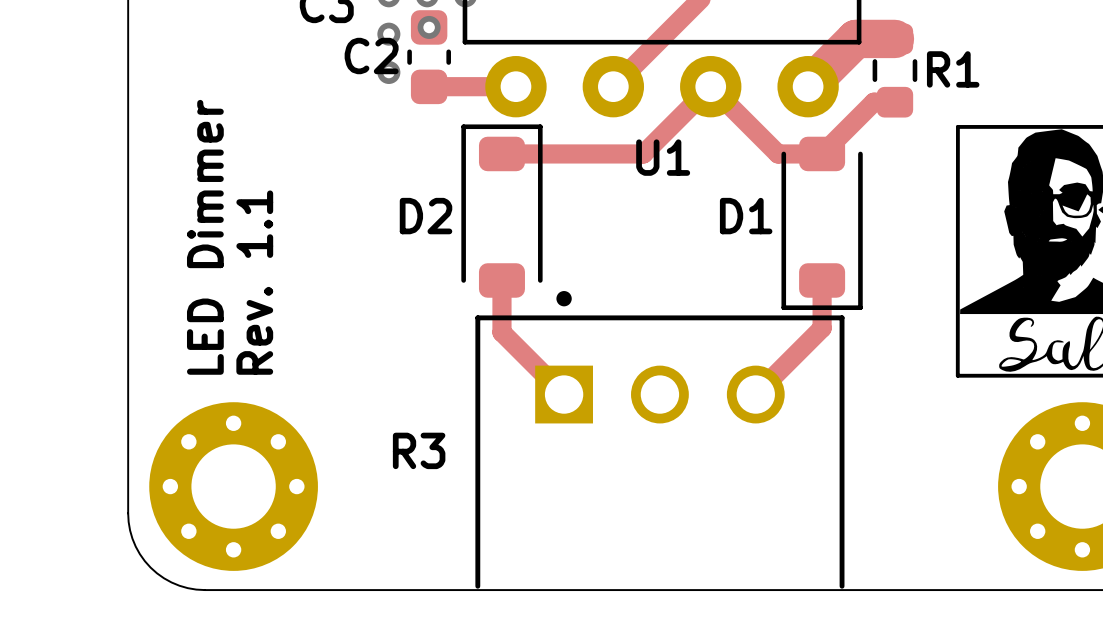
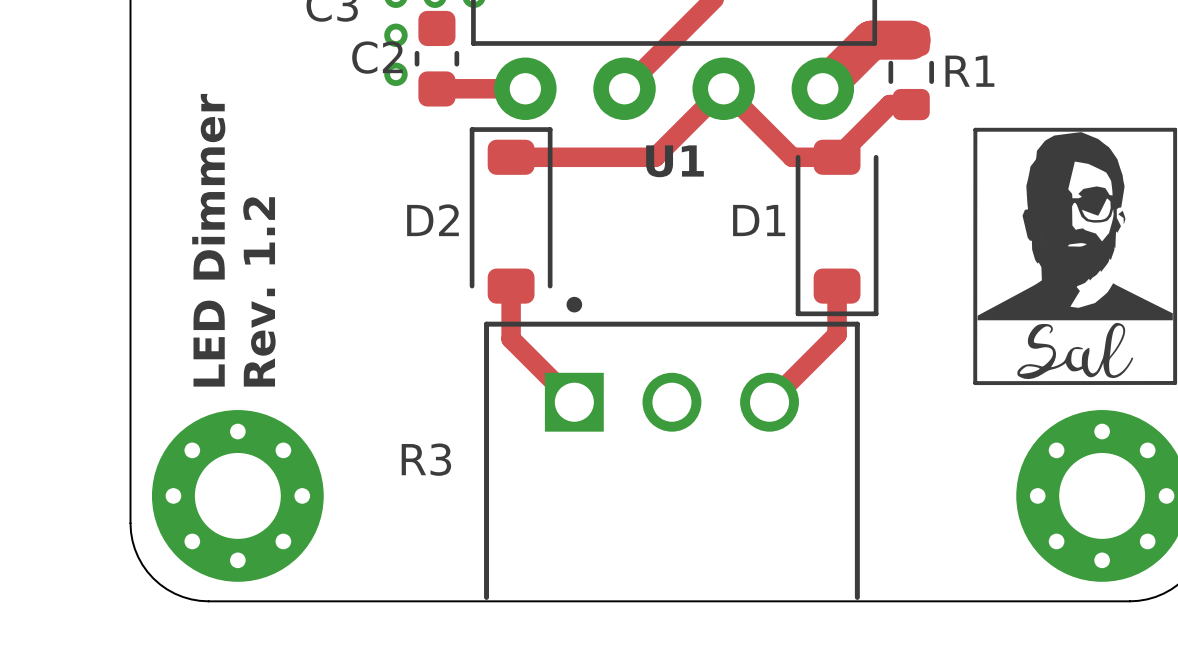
via: (429, 27) -> none
text: Rev. 1.1 (254, 282) -> Rev. 1.2 (259, 291)

